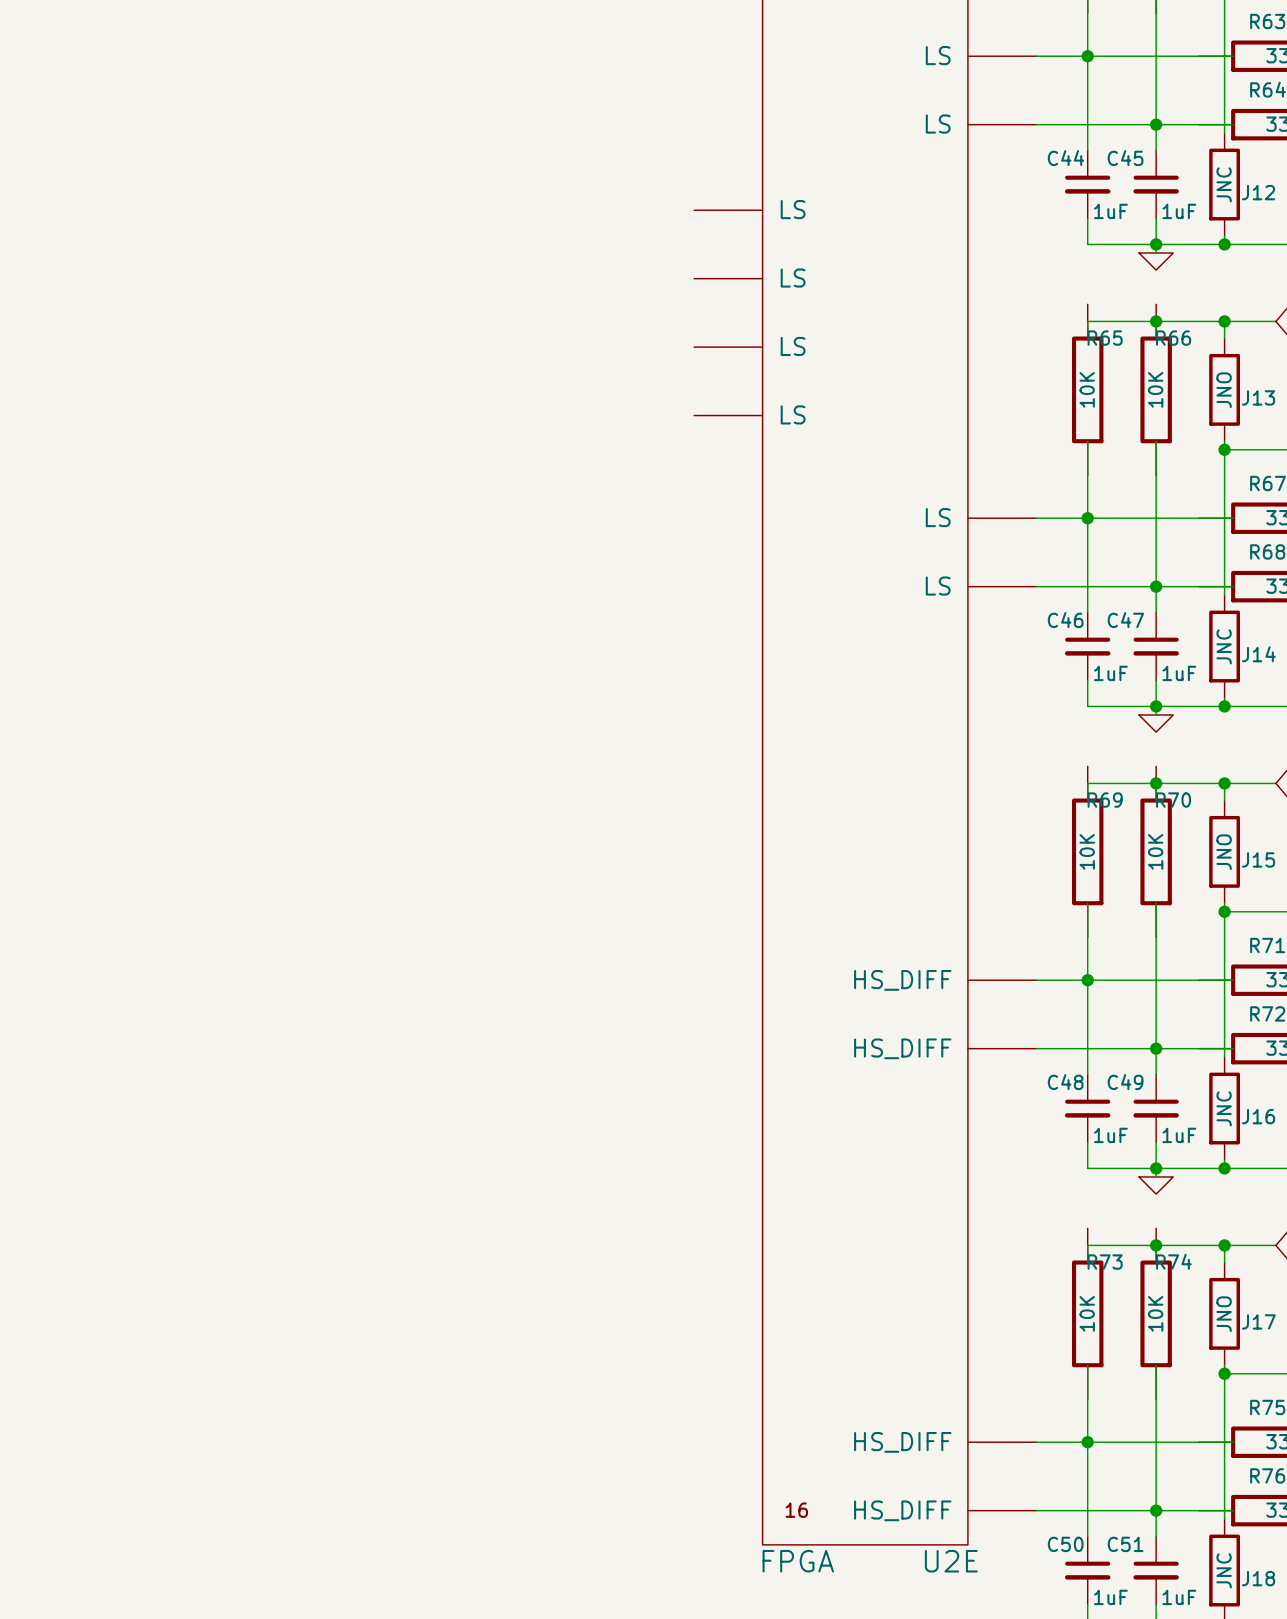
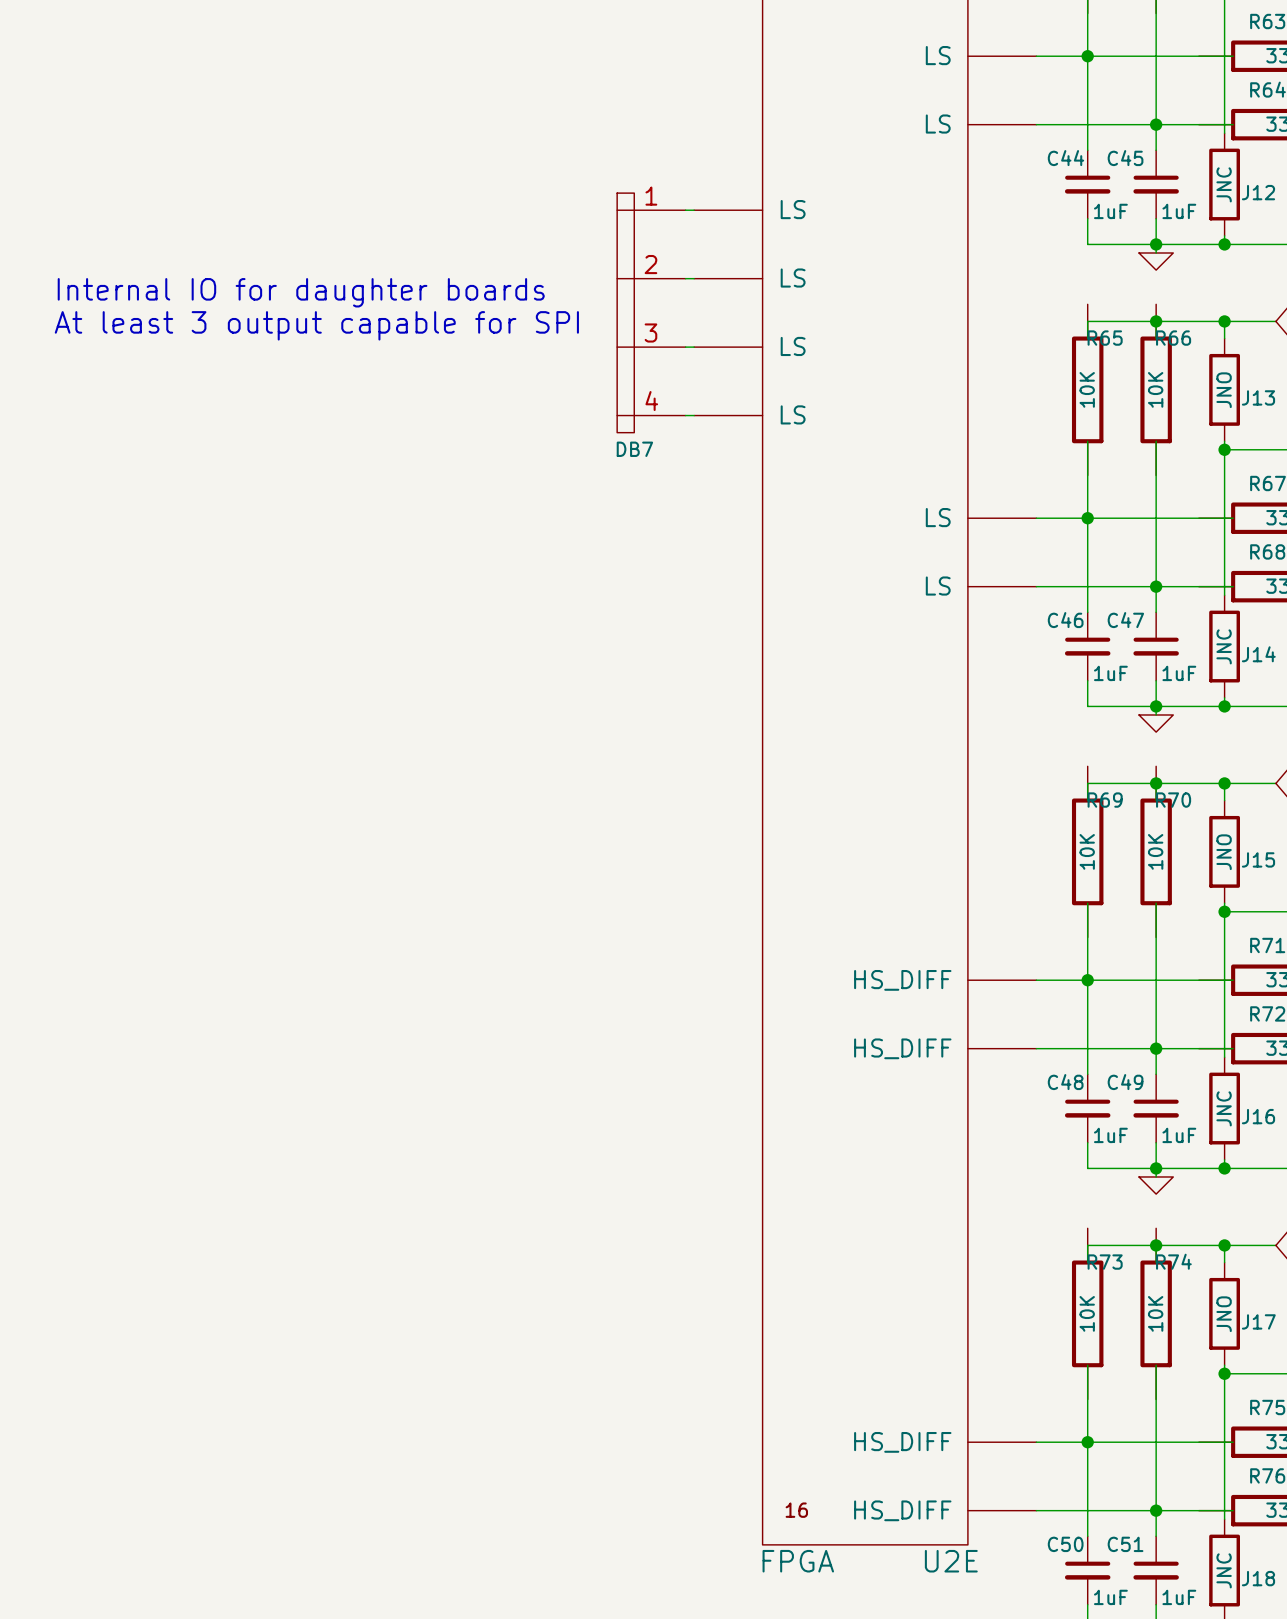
wire: none -> (685, 210) (694, 210)
wire: none -> (685, 278) (694, 278)
text: none -> Internal IO for daughter boards (301, 292)
DB7: none -> (651, 312)
text: none -> At least 3 output capable for SPI (316, 325)
wire: none -> (685, 347) (694, 347)
wire: none -> (685, 415) (694, 415)

